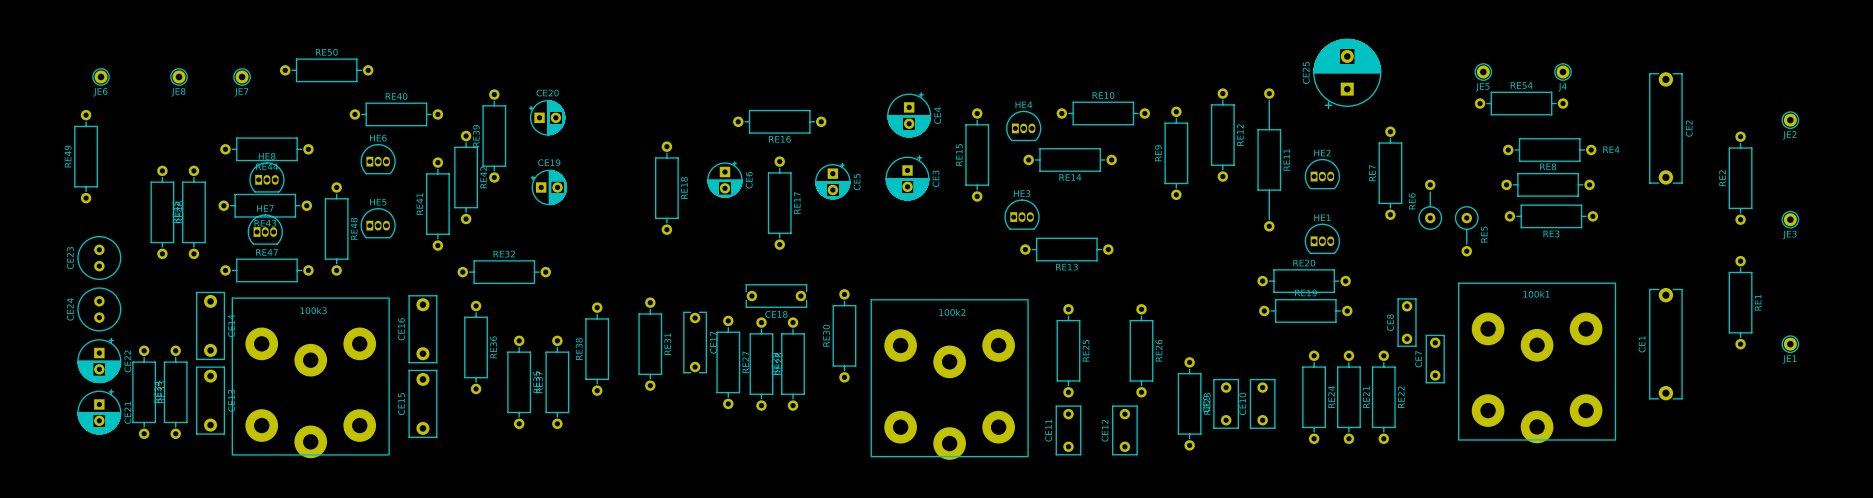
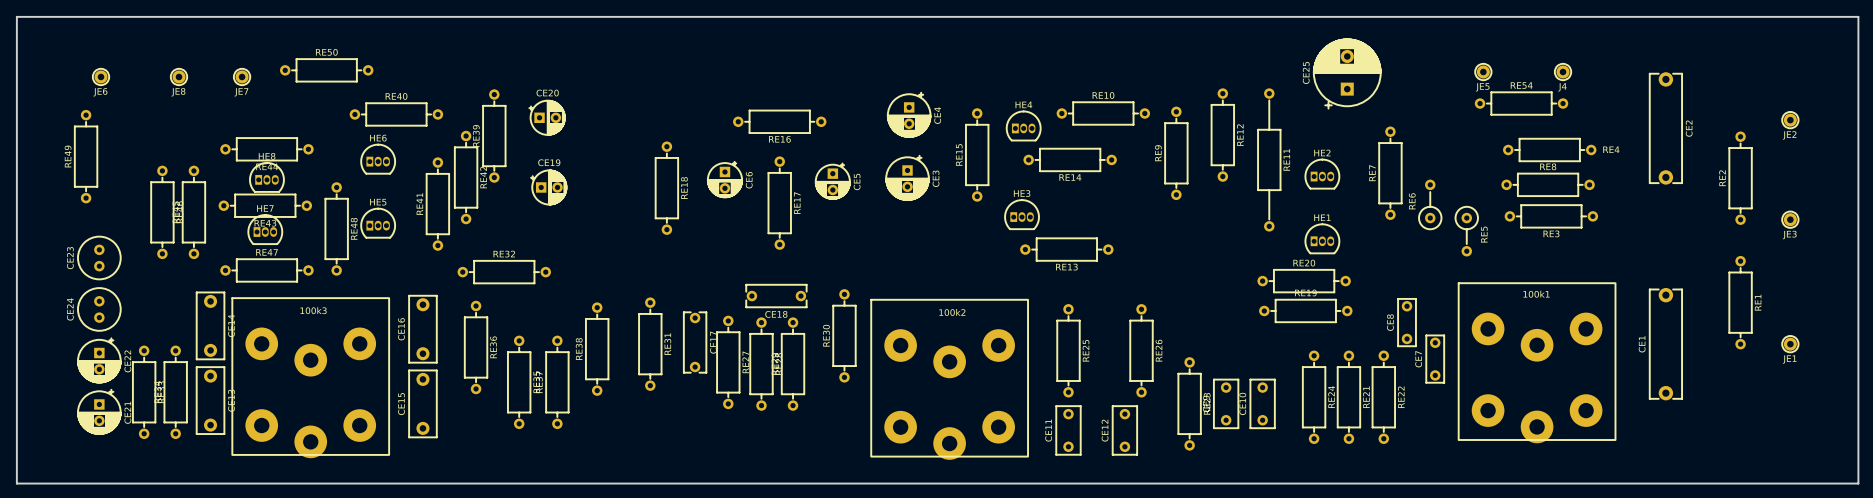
board edge: none -> (16, 16) (1858, 16) (1858, 483) (16, 483) (16, 16)

